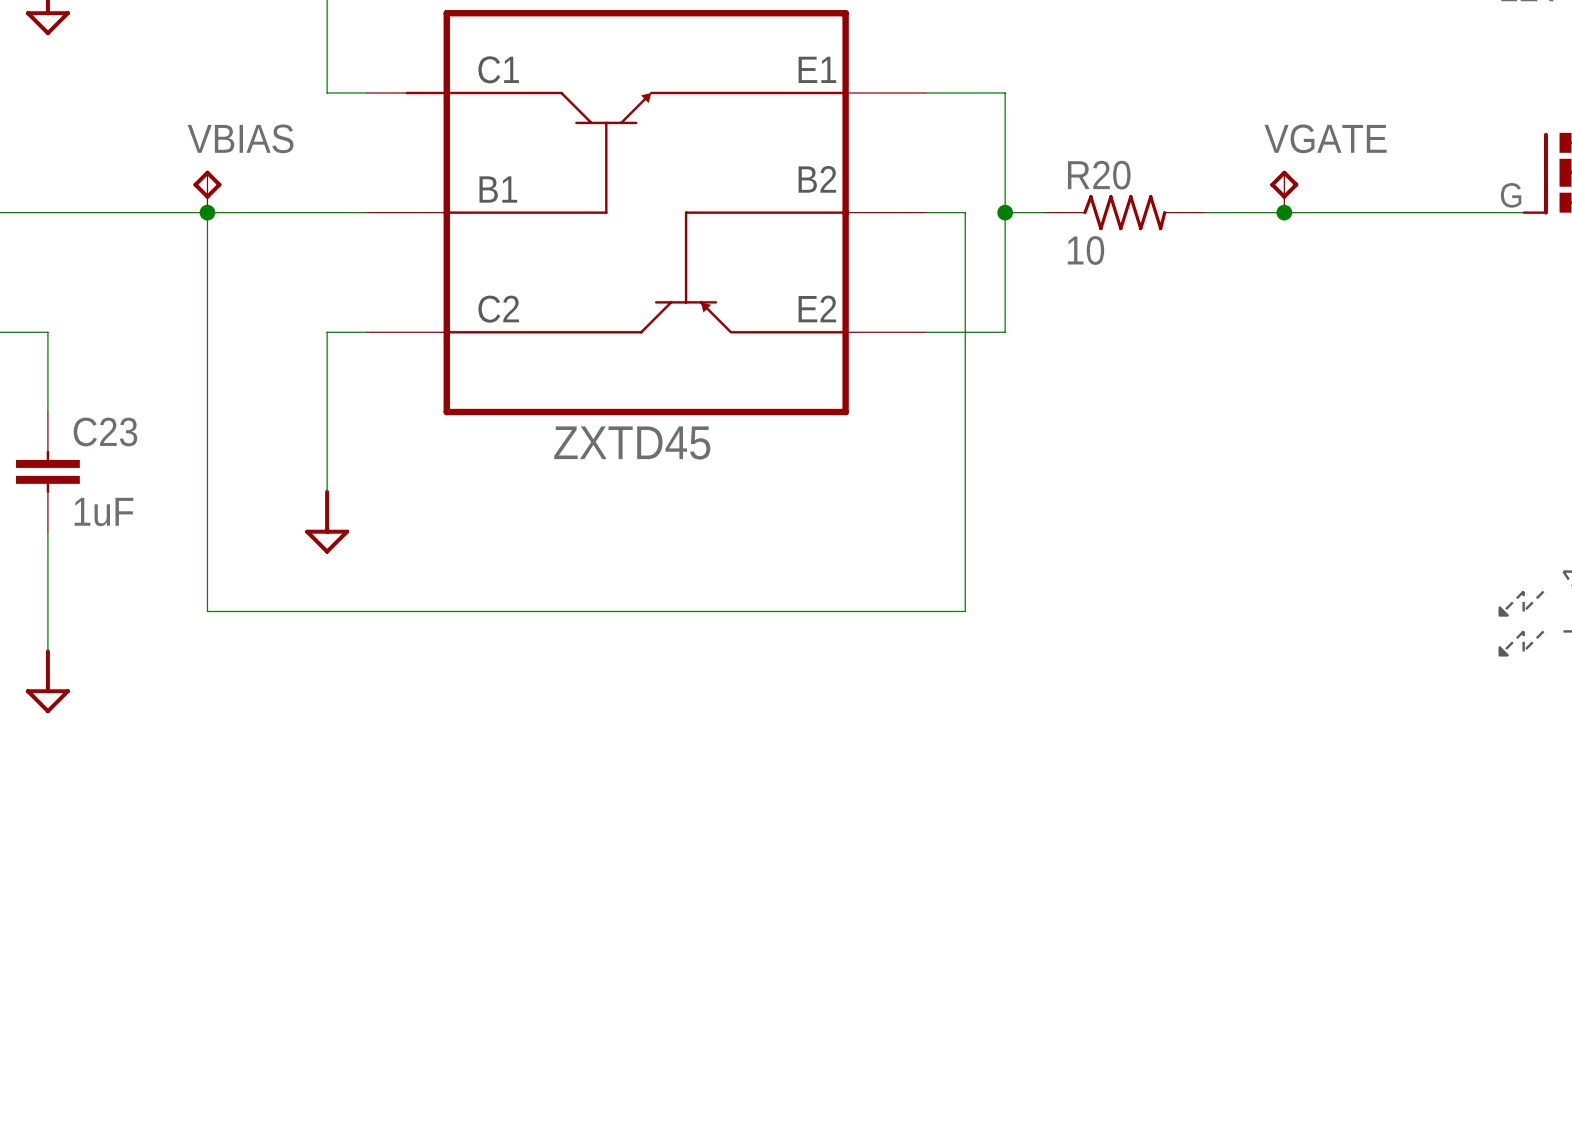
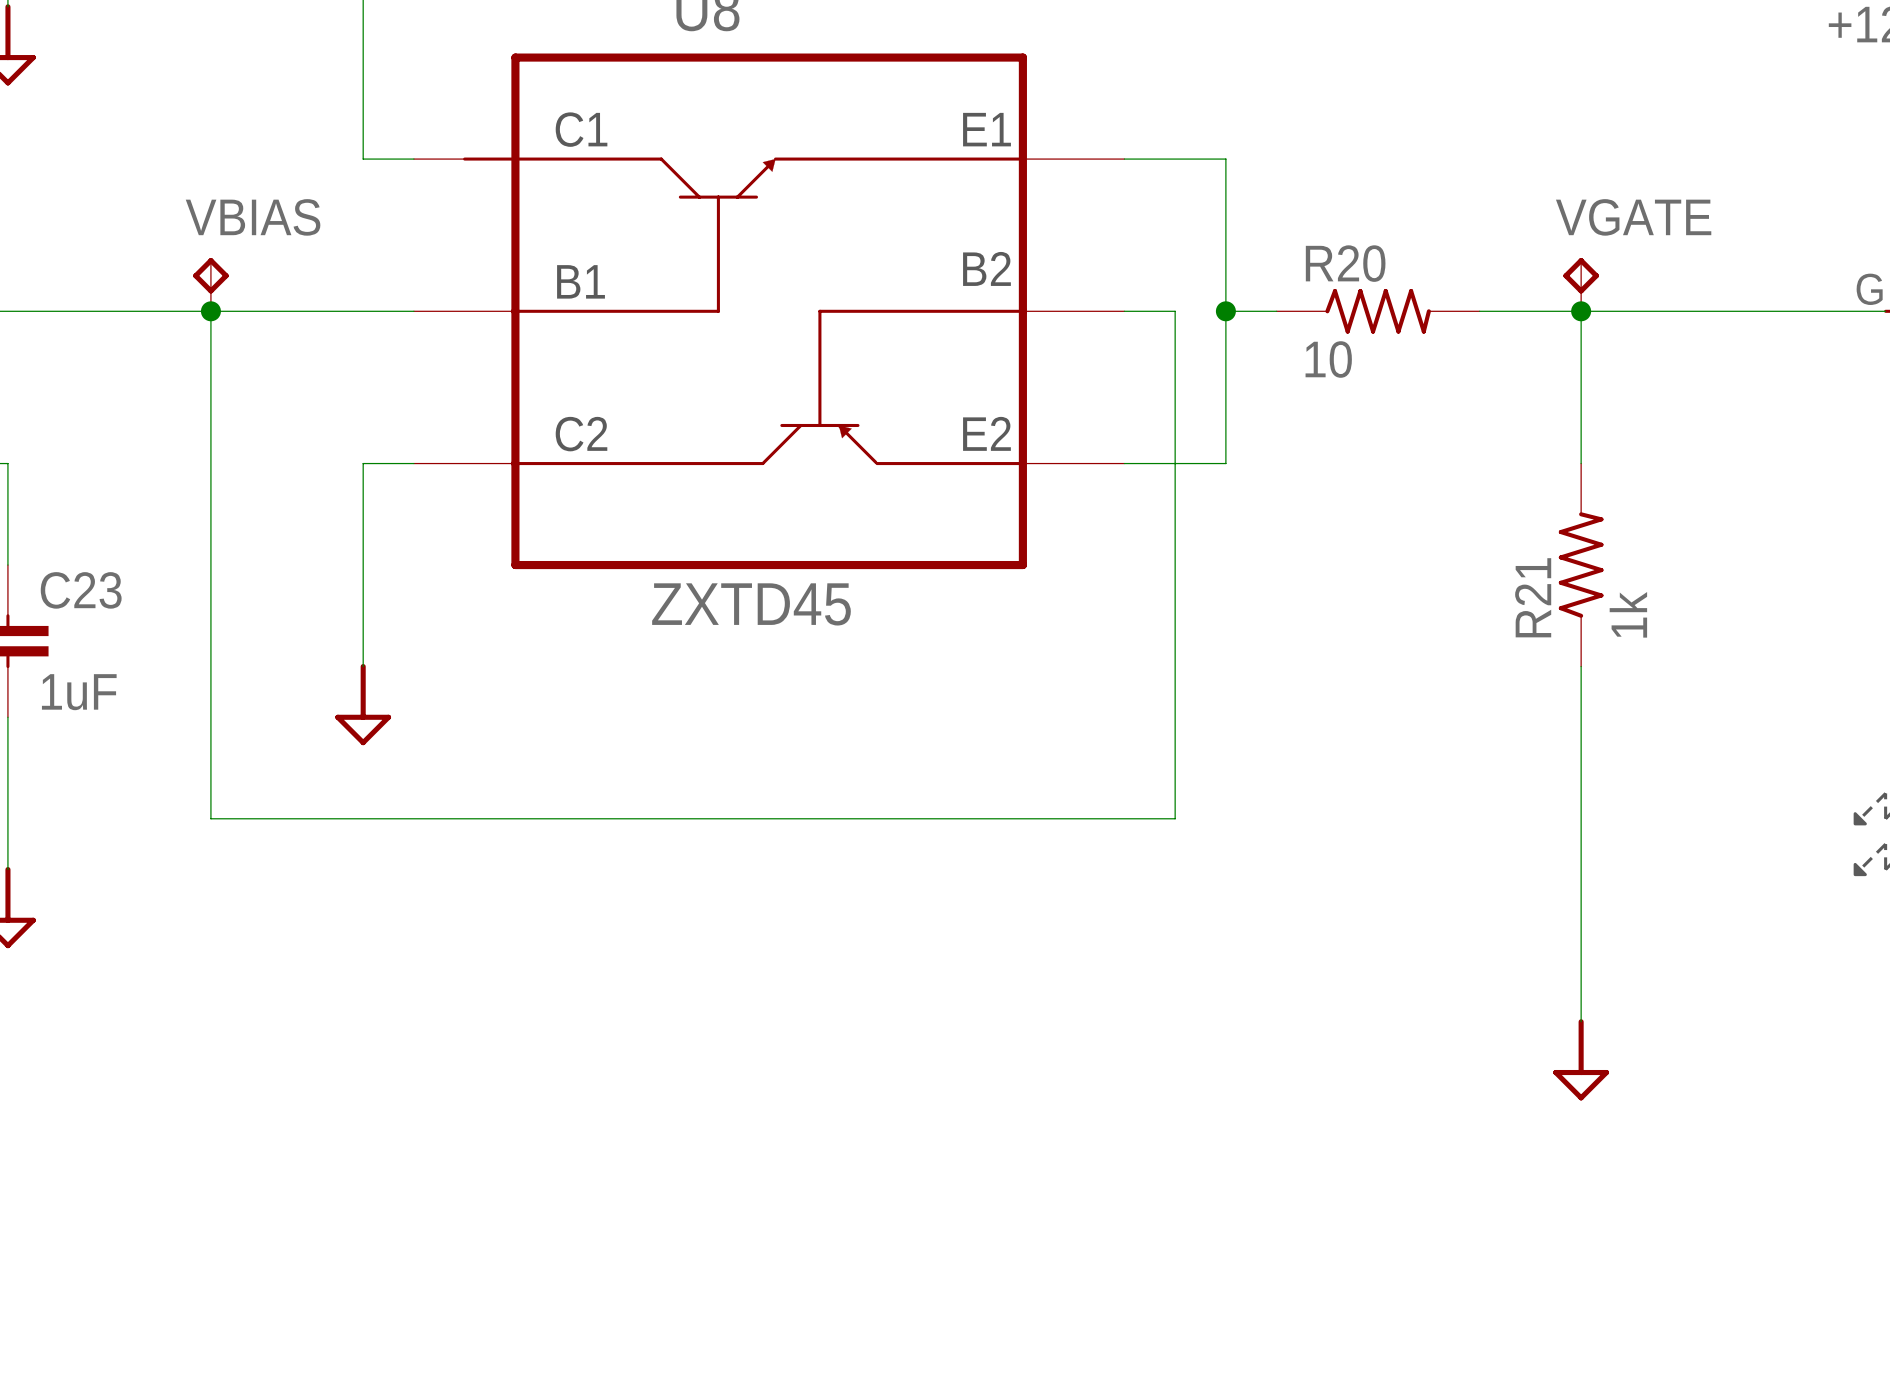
wire: none -> (1581, 311) (1581, 463)
R21: none -> 1k (1581, 565)
wire: none -> (1581, 666) (1581, 1021)
part: none -> (1581, 1059)

